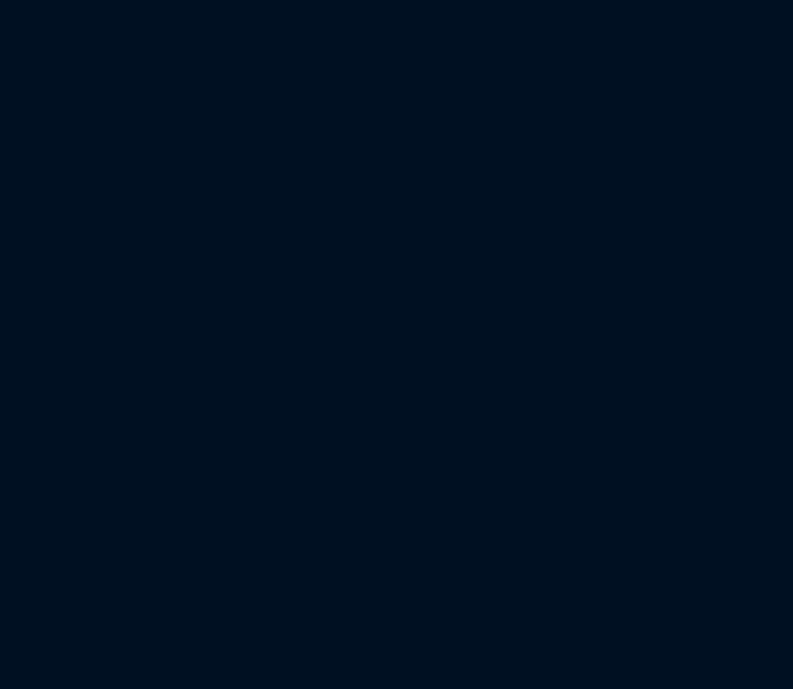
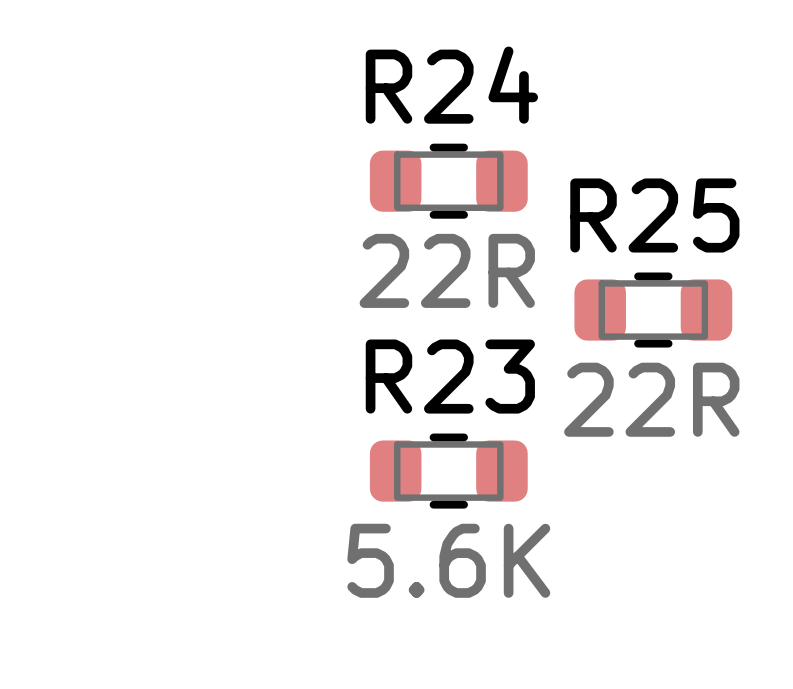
R24: none -> 22R (448, 181)
R25: none -> 22R (653, 310)
R23: none -> 5.6K (448, 471)

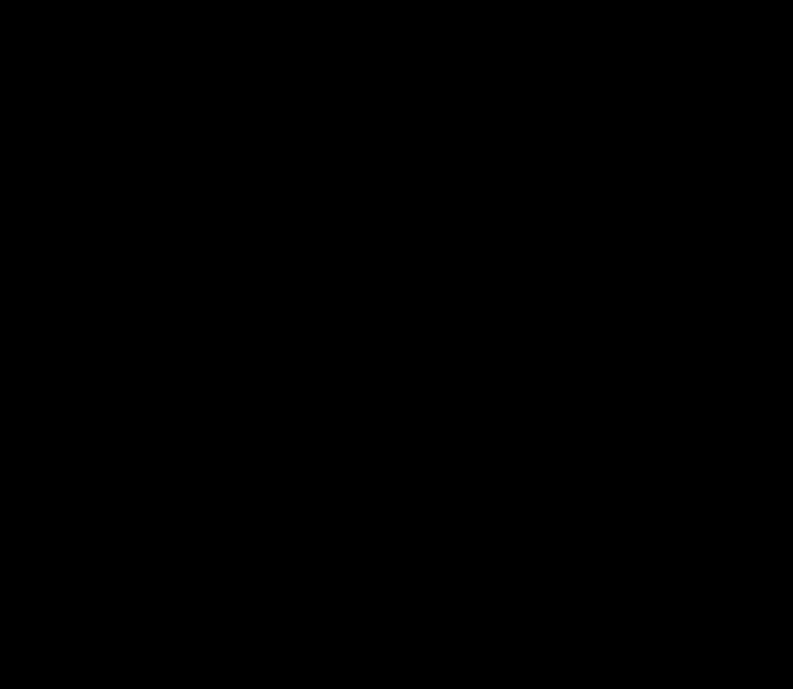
R24: 22R (448, 181) -> none
R25: 22R (653, 310) -> none
R23: 5.6K (448, 471) -> none

